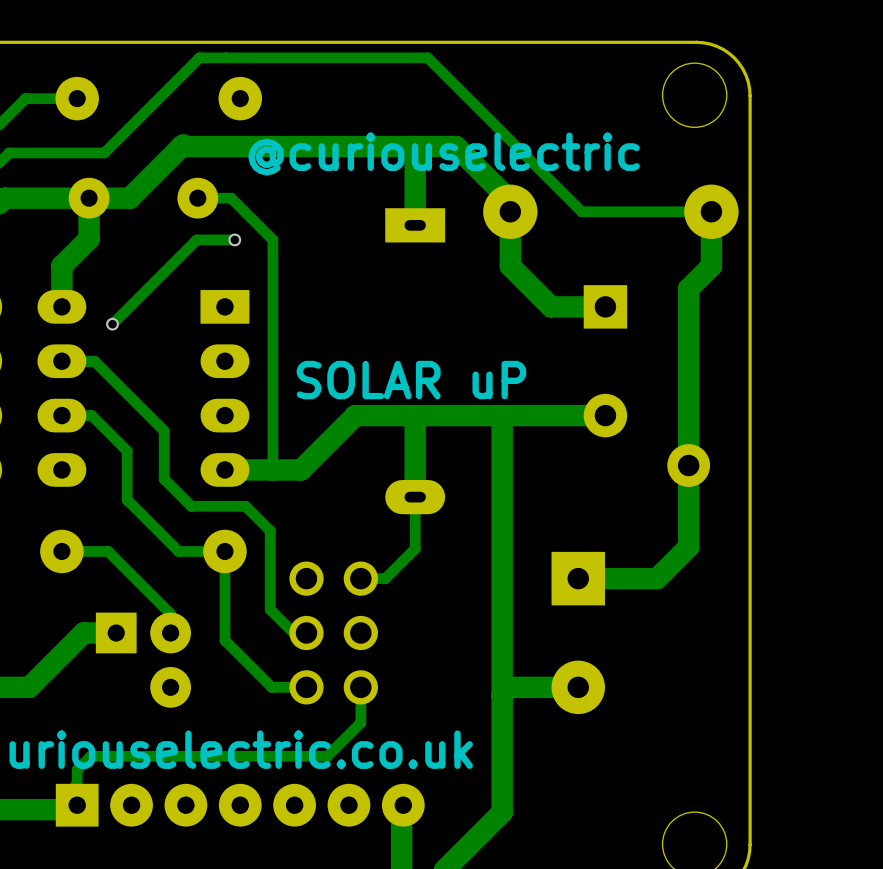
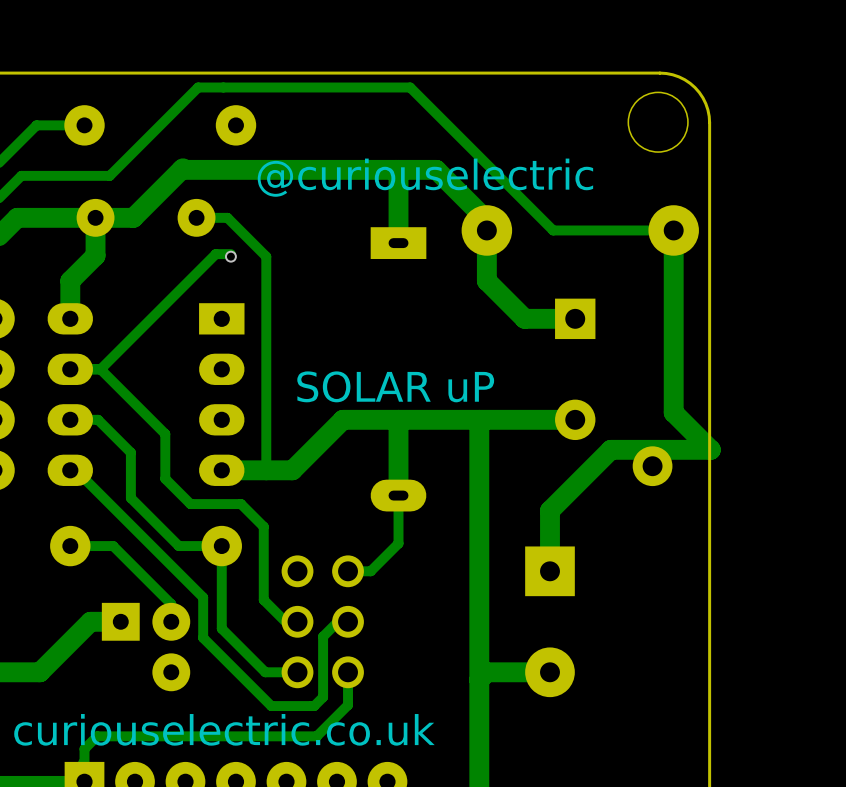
track: none -> (230, 254) (215, 254) (100, 369)
track: (234, 239) (196, 239) (112, 324) -> none
track: (711, 266) (688, 288) (688, 547) (657, 578) (578, 578) -> (710, 449) (610, 449) (549, 510) (549, 571)
track: none -> (673, 280) (673, 412) (710, 449)
via: (112, 324) -> none
track: none -> (76, 470) (203, 597) (203, 637) (271, 706) (314, 706) (323, 697) (323, 636) (337, 621)

